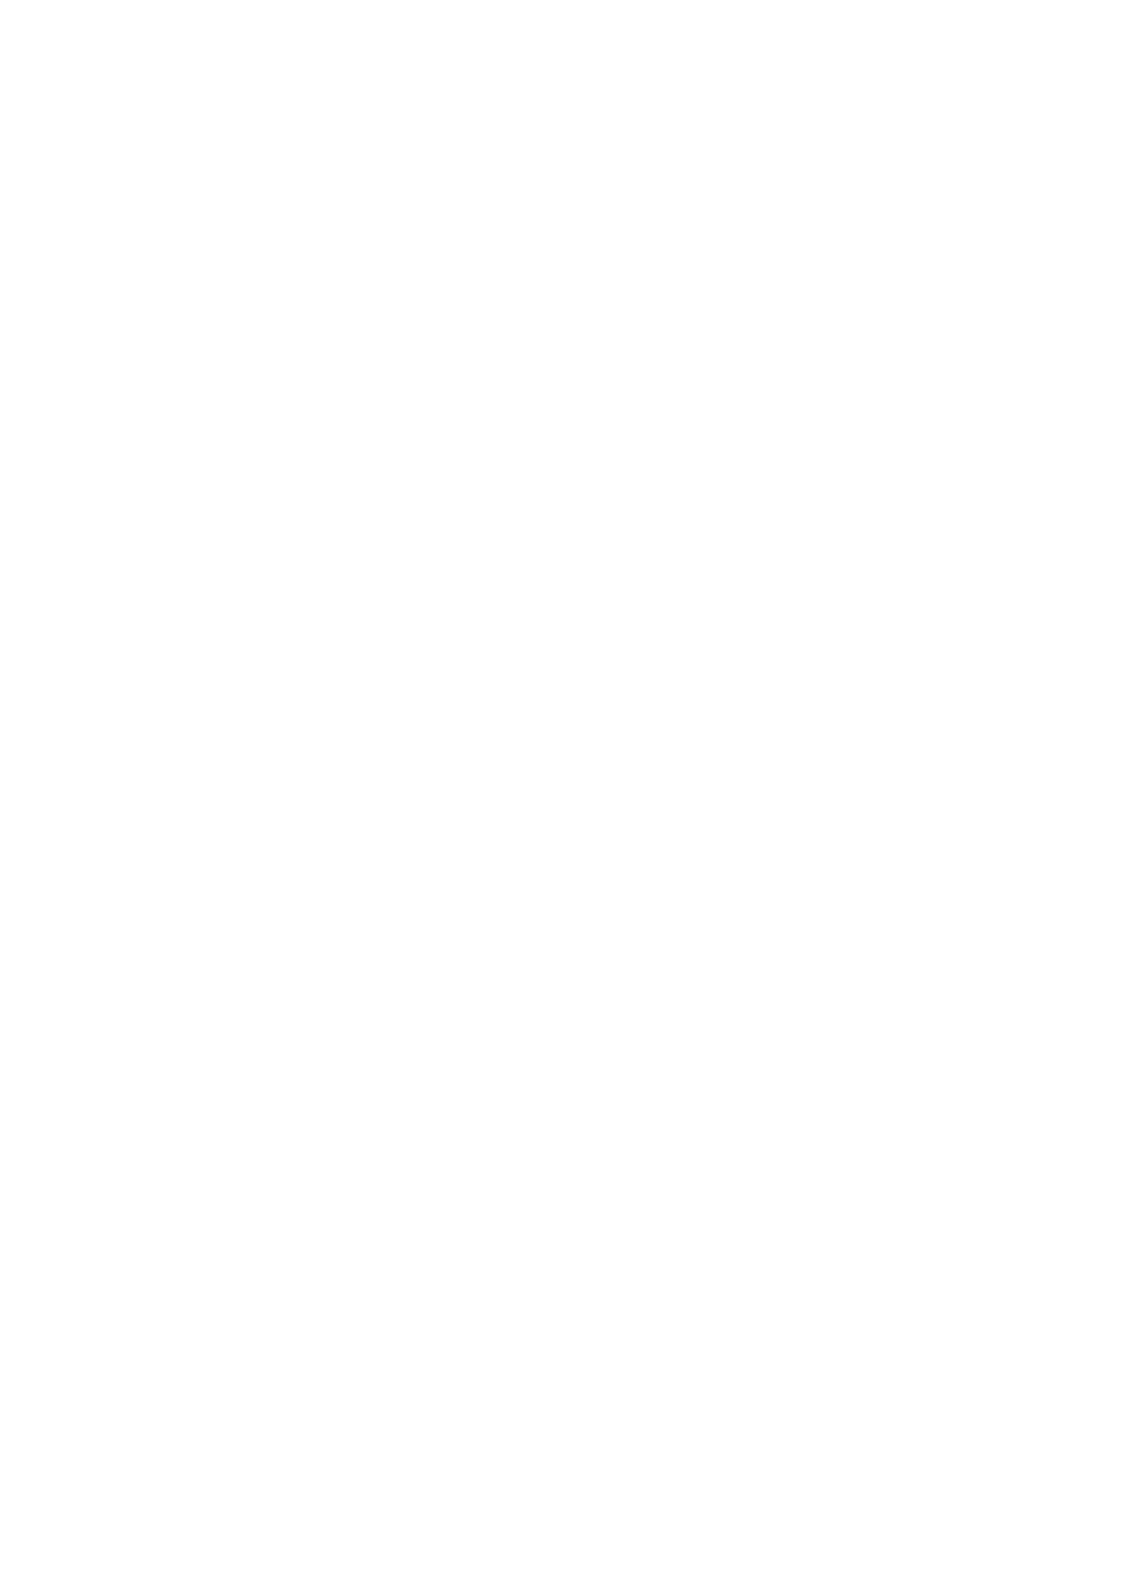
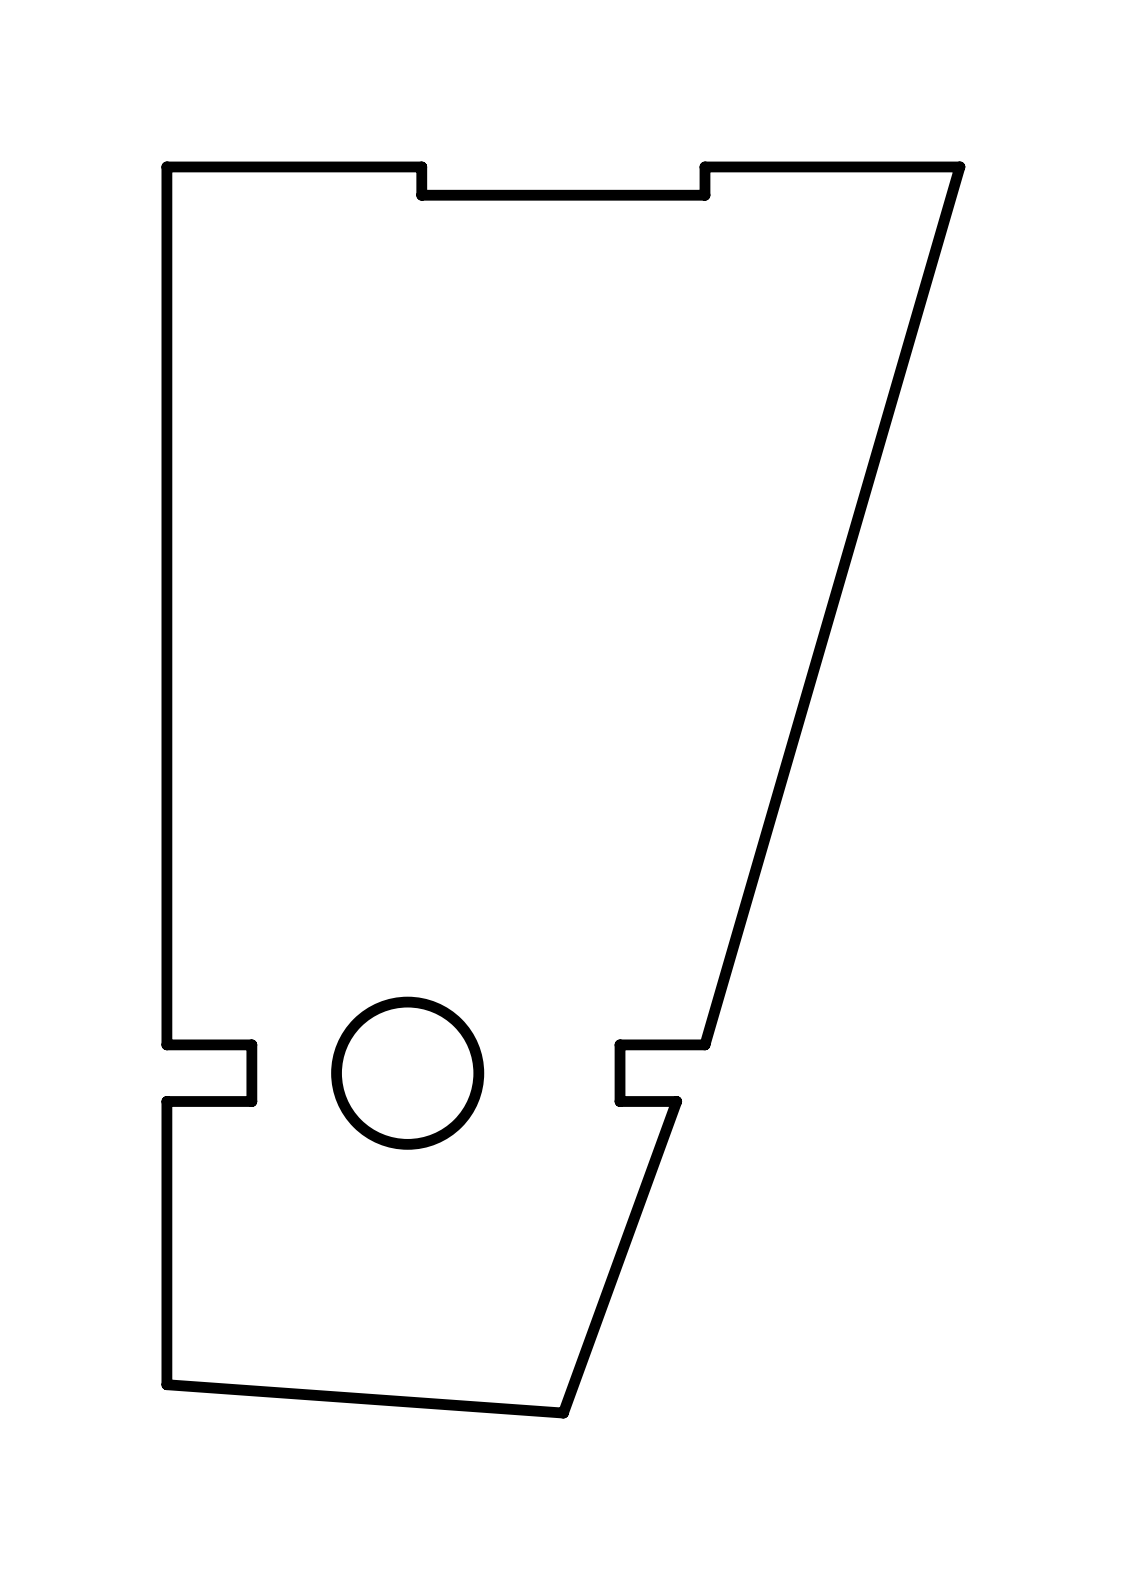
board edge: none -> (166, 166) (166, 1044) (251, 1044) (251, 1101) (166, 1101) (166, 1384) (563, 1413) (676, 1101) (620, 1101) (620, 1044) (704, 1044) (959, 166) (704, 166) (704, 195) (421, 195) (421, 166) (166, 166)
round board edge: none -> [331, 996, 485, 1150]

